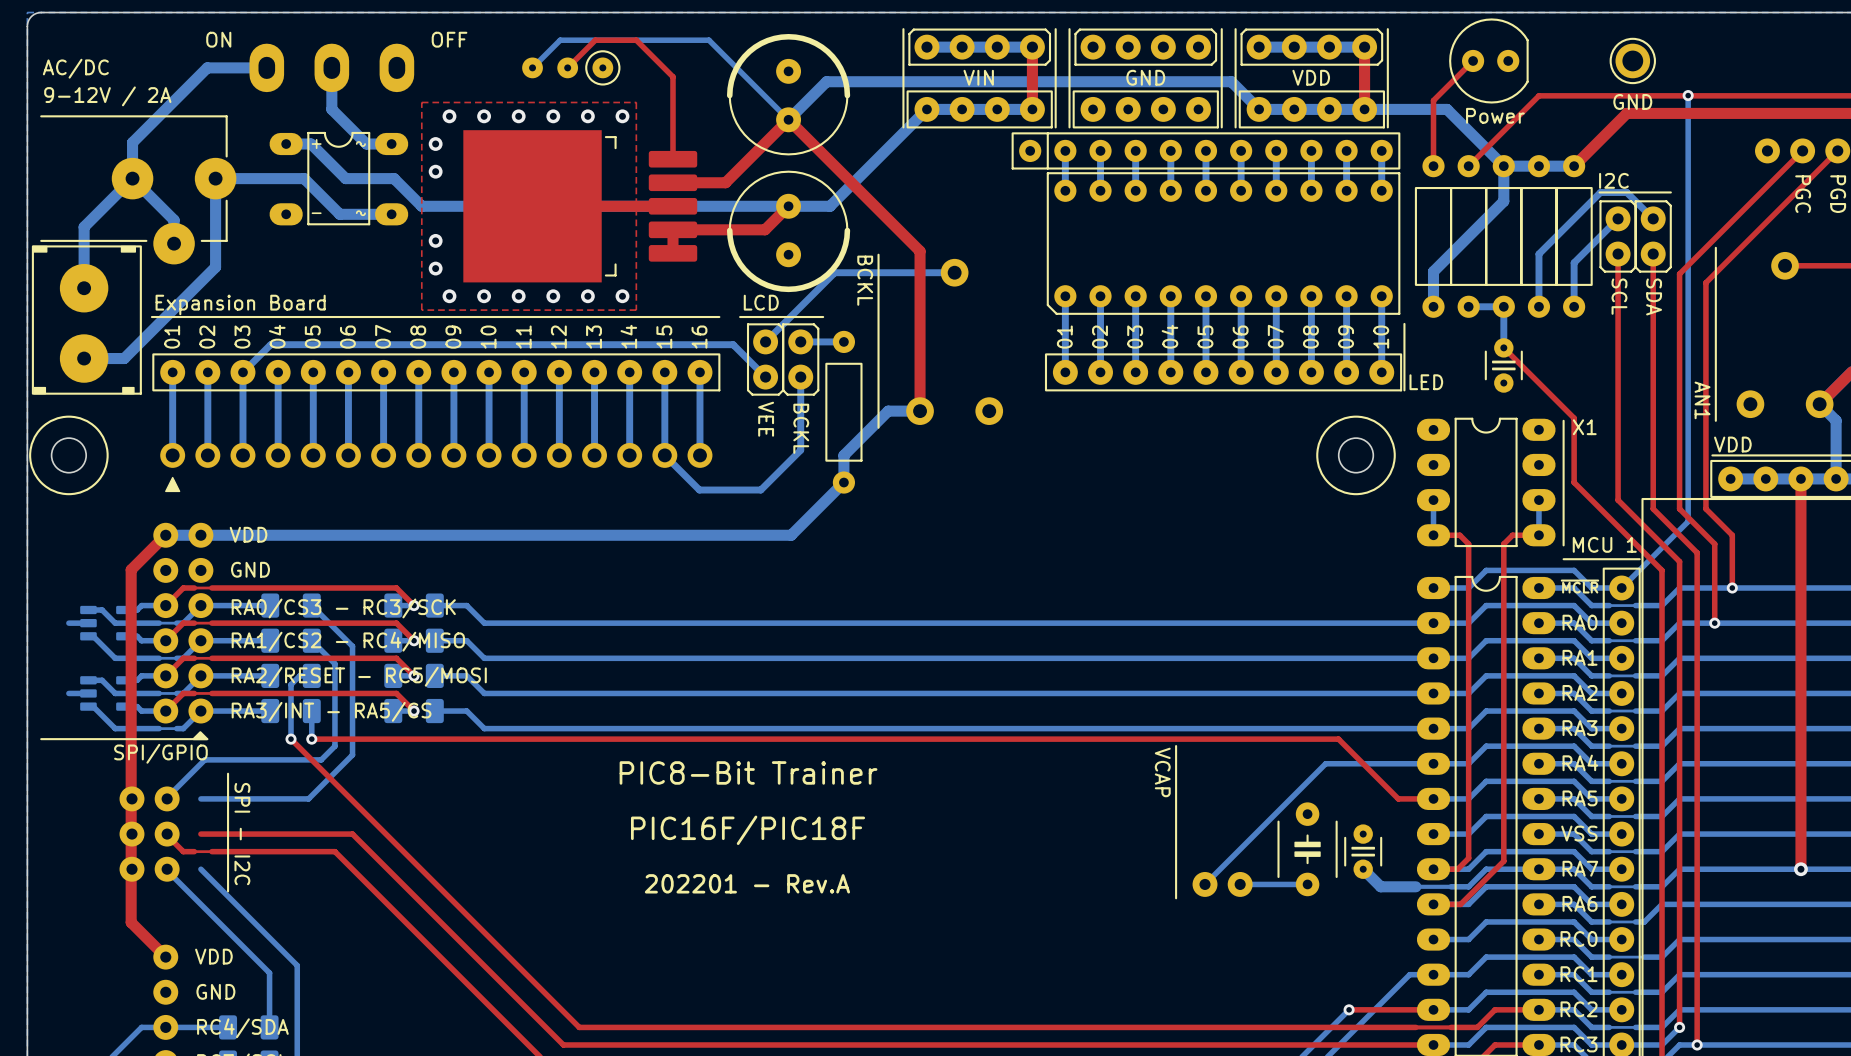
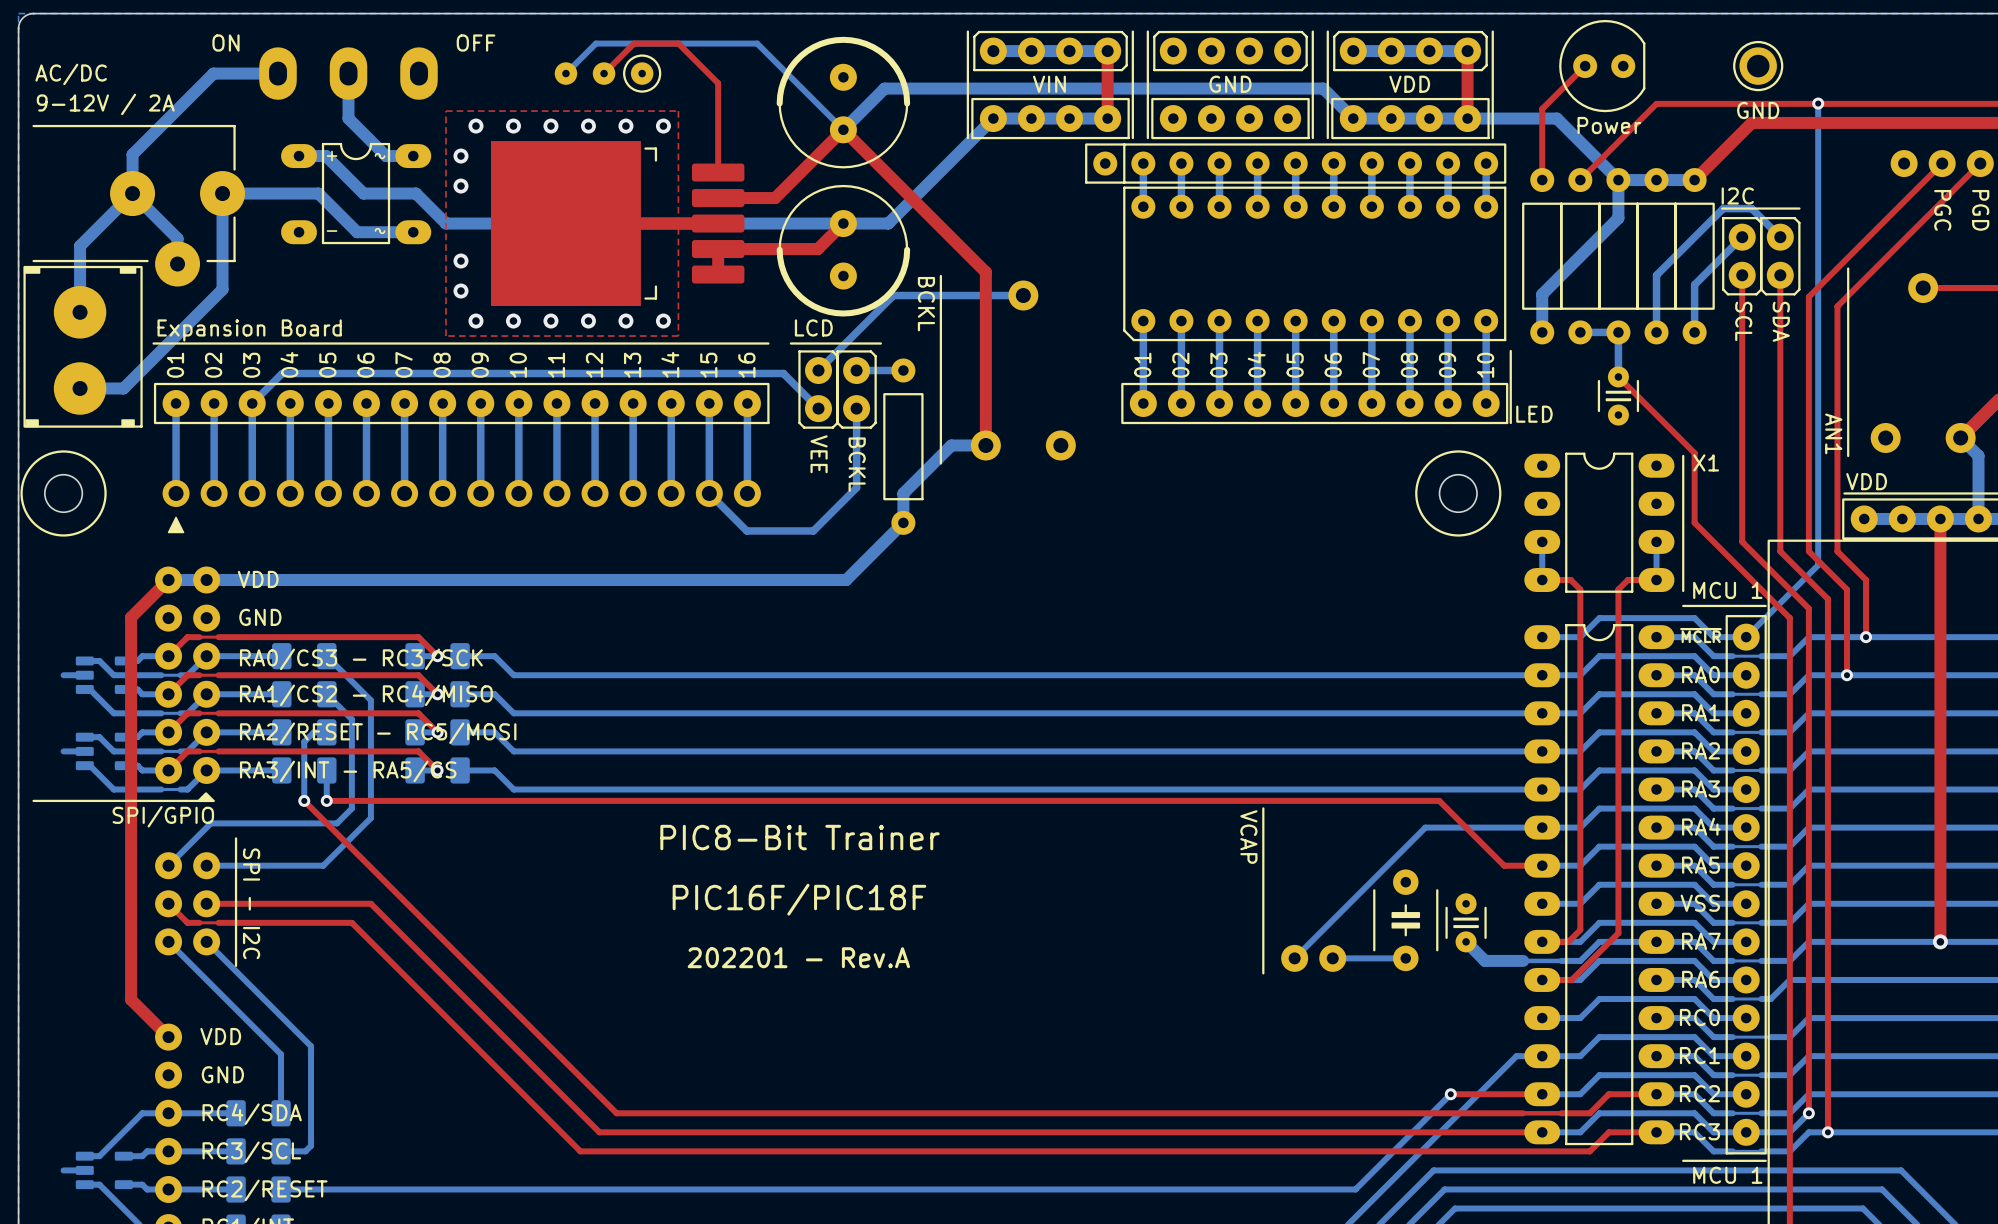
part position: (149, 834) -> (187, 903)

